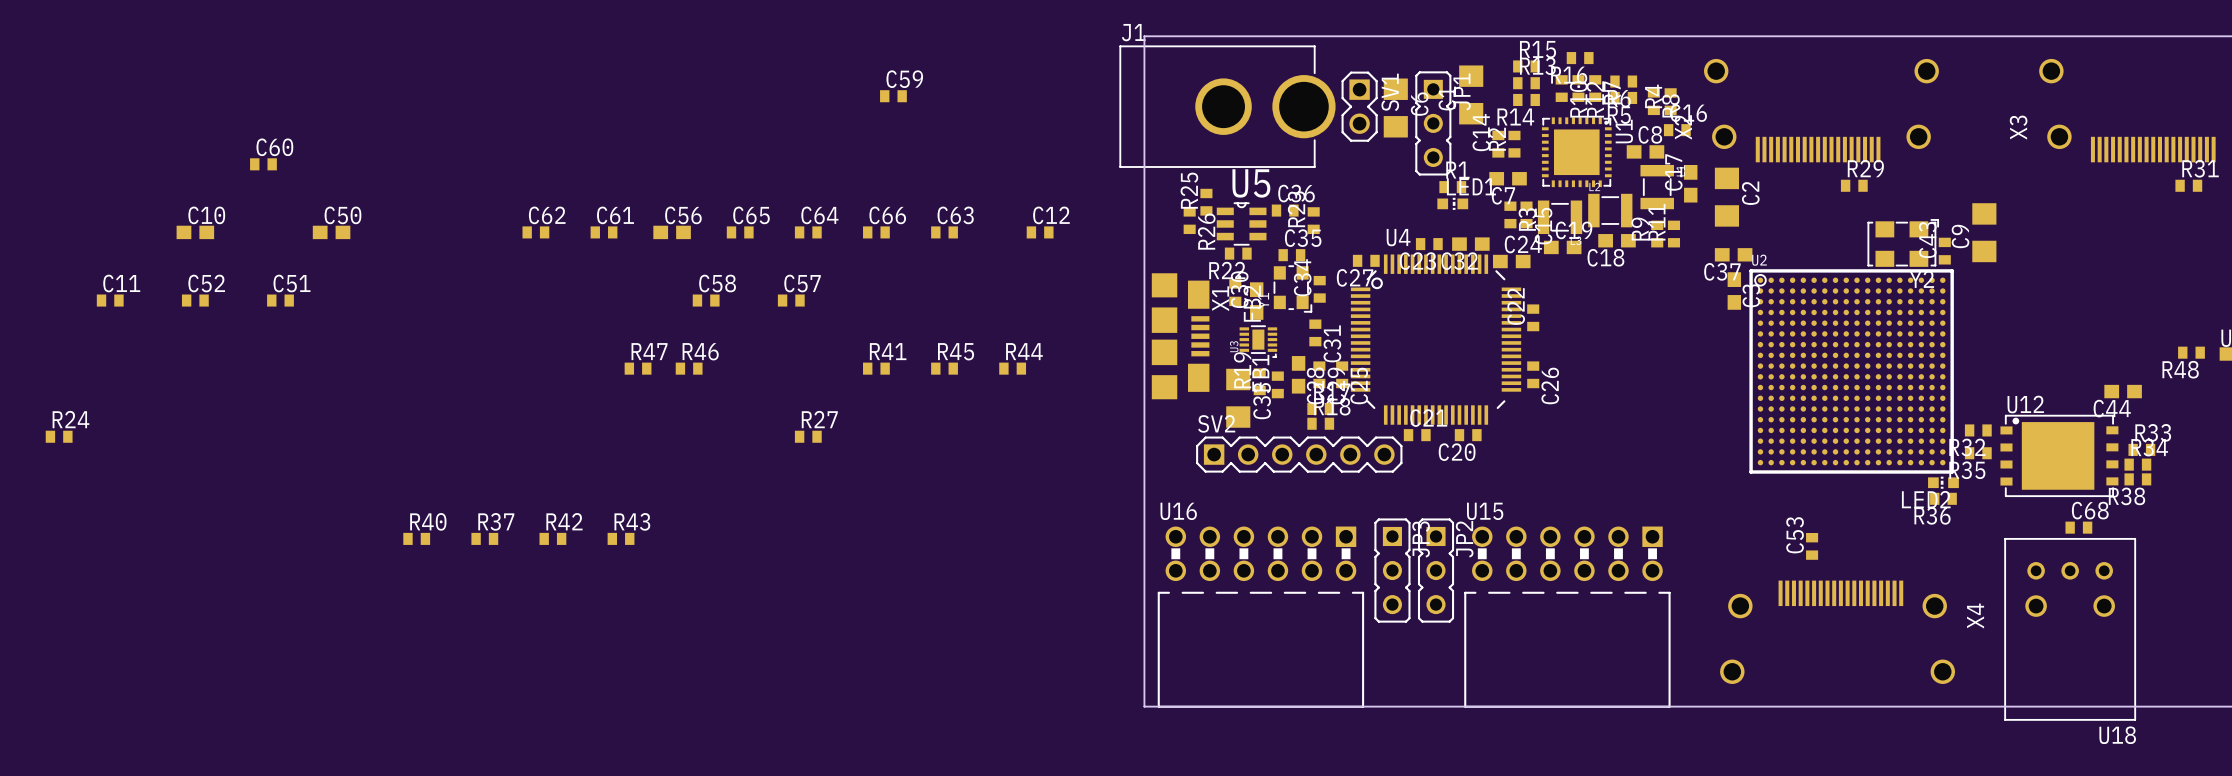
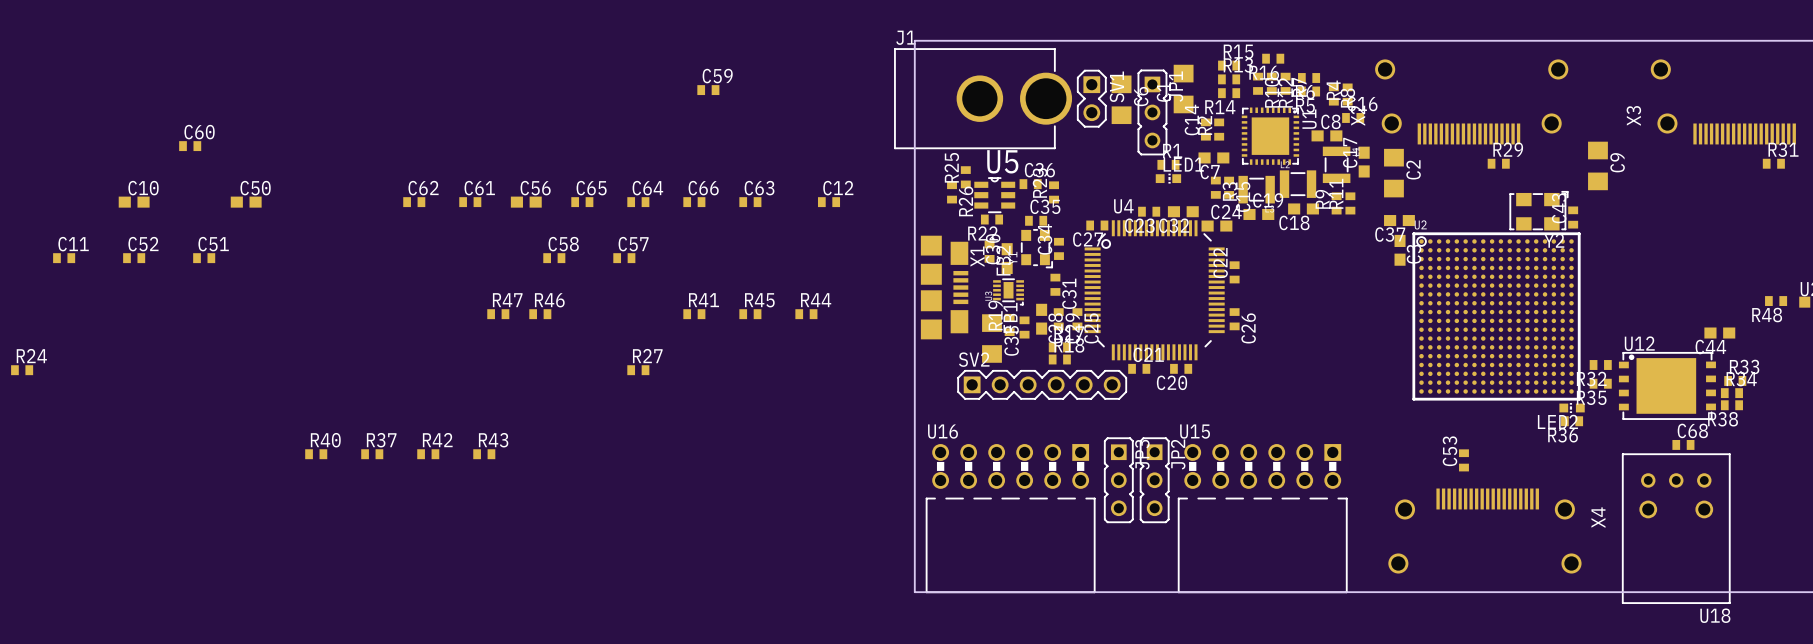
C9 position: (1984, 232) -> (1597, 165)
C9 name position: C9 (1960, 236) -> C9 (1617, 162)

